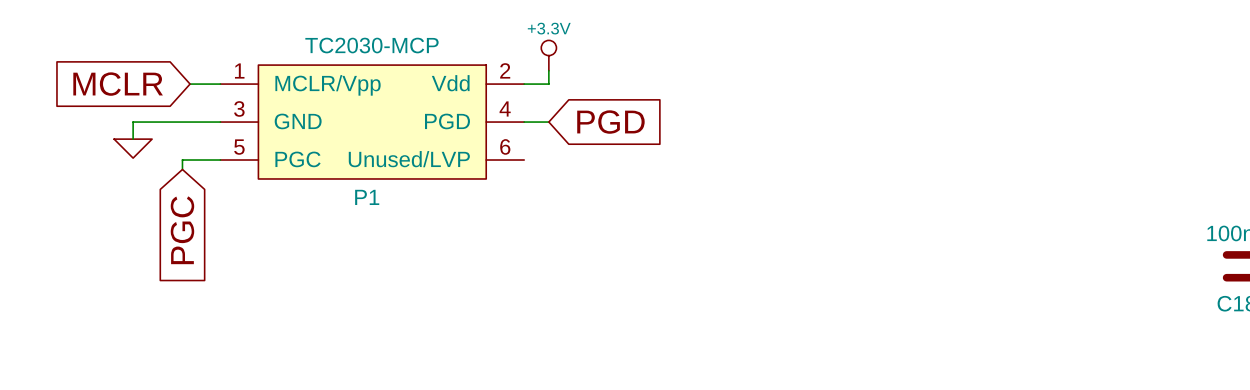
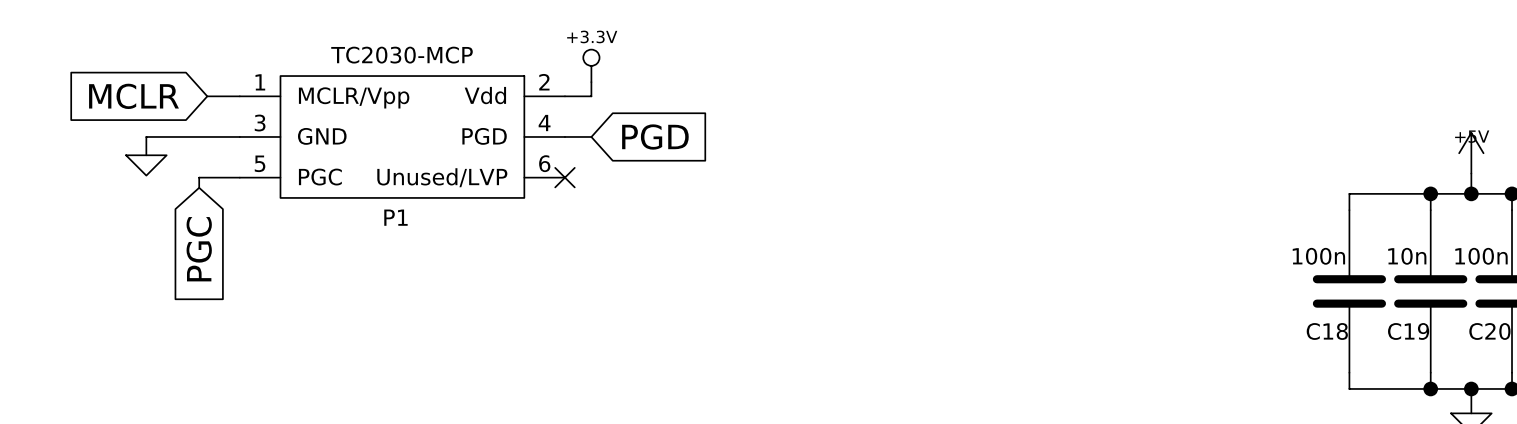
no-connect mark: none -> (564, 177)

